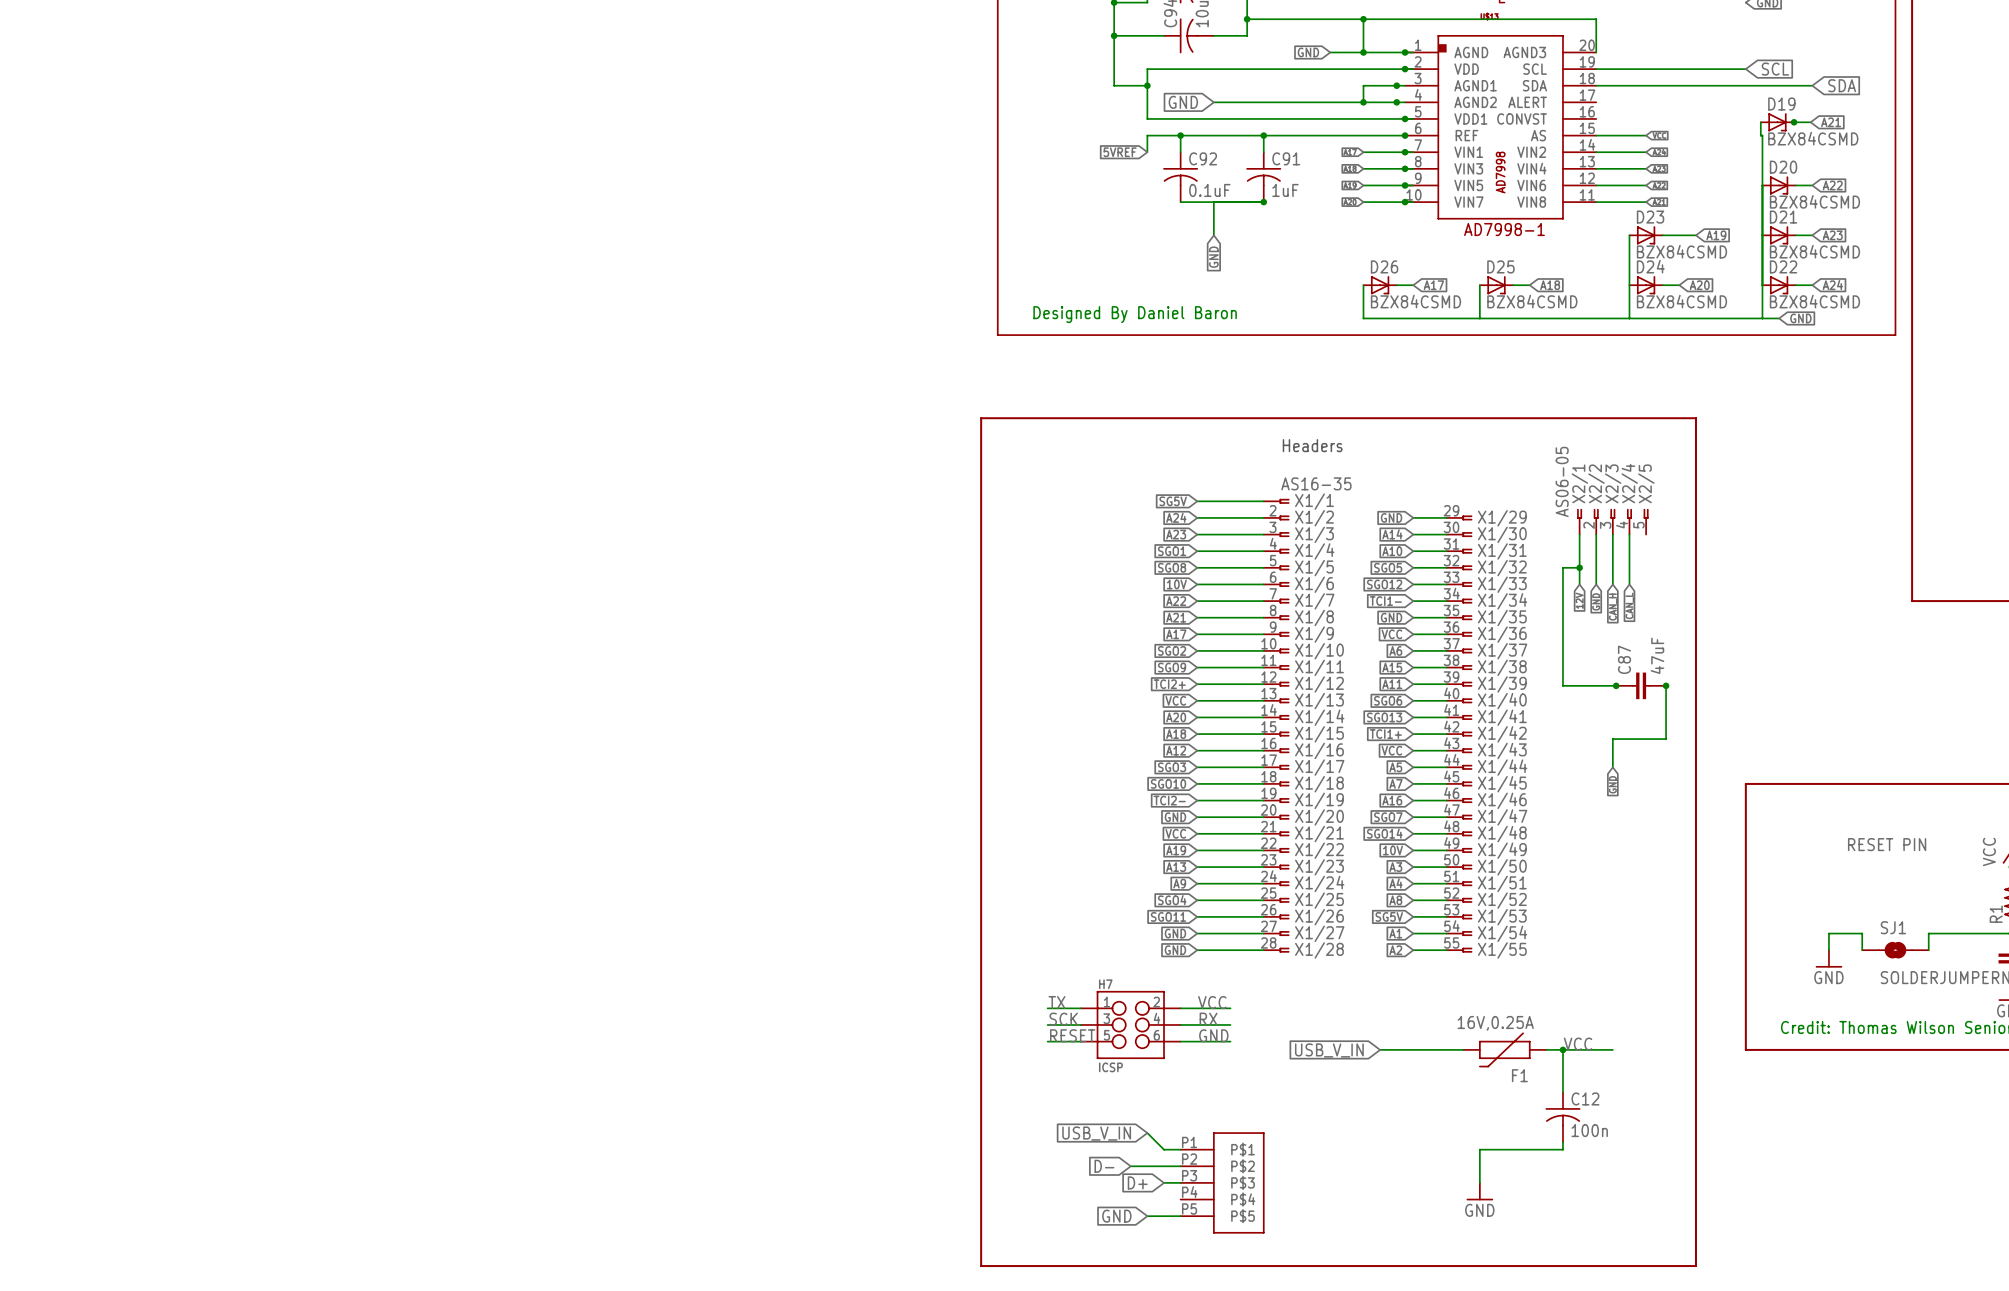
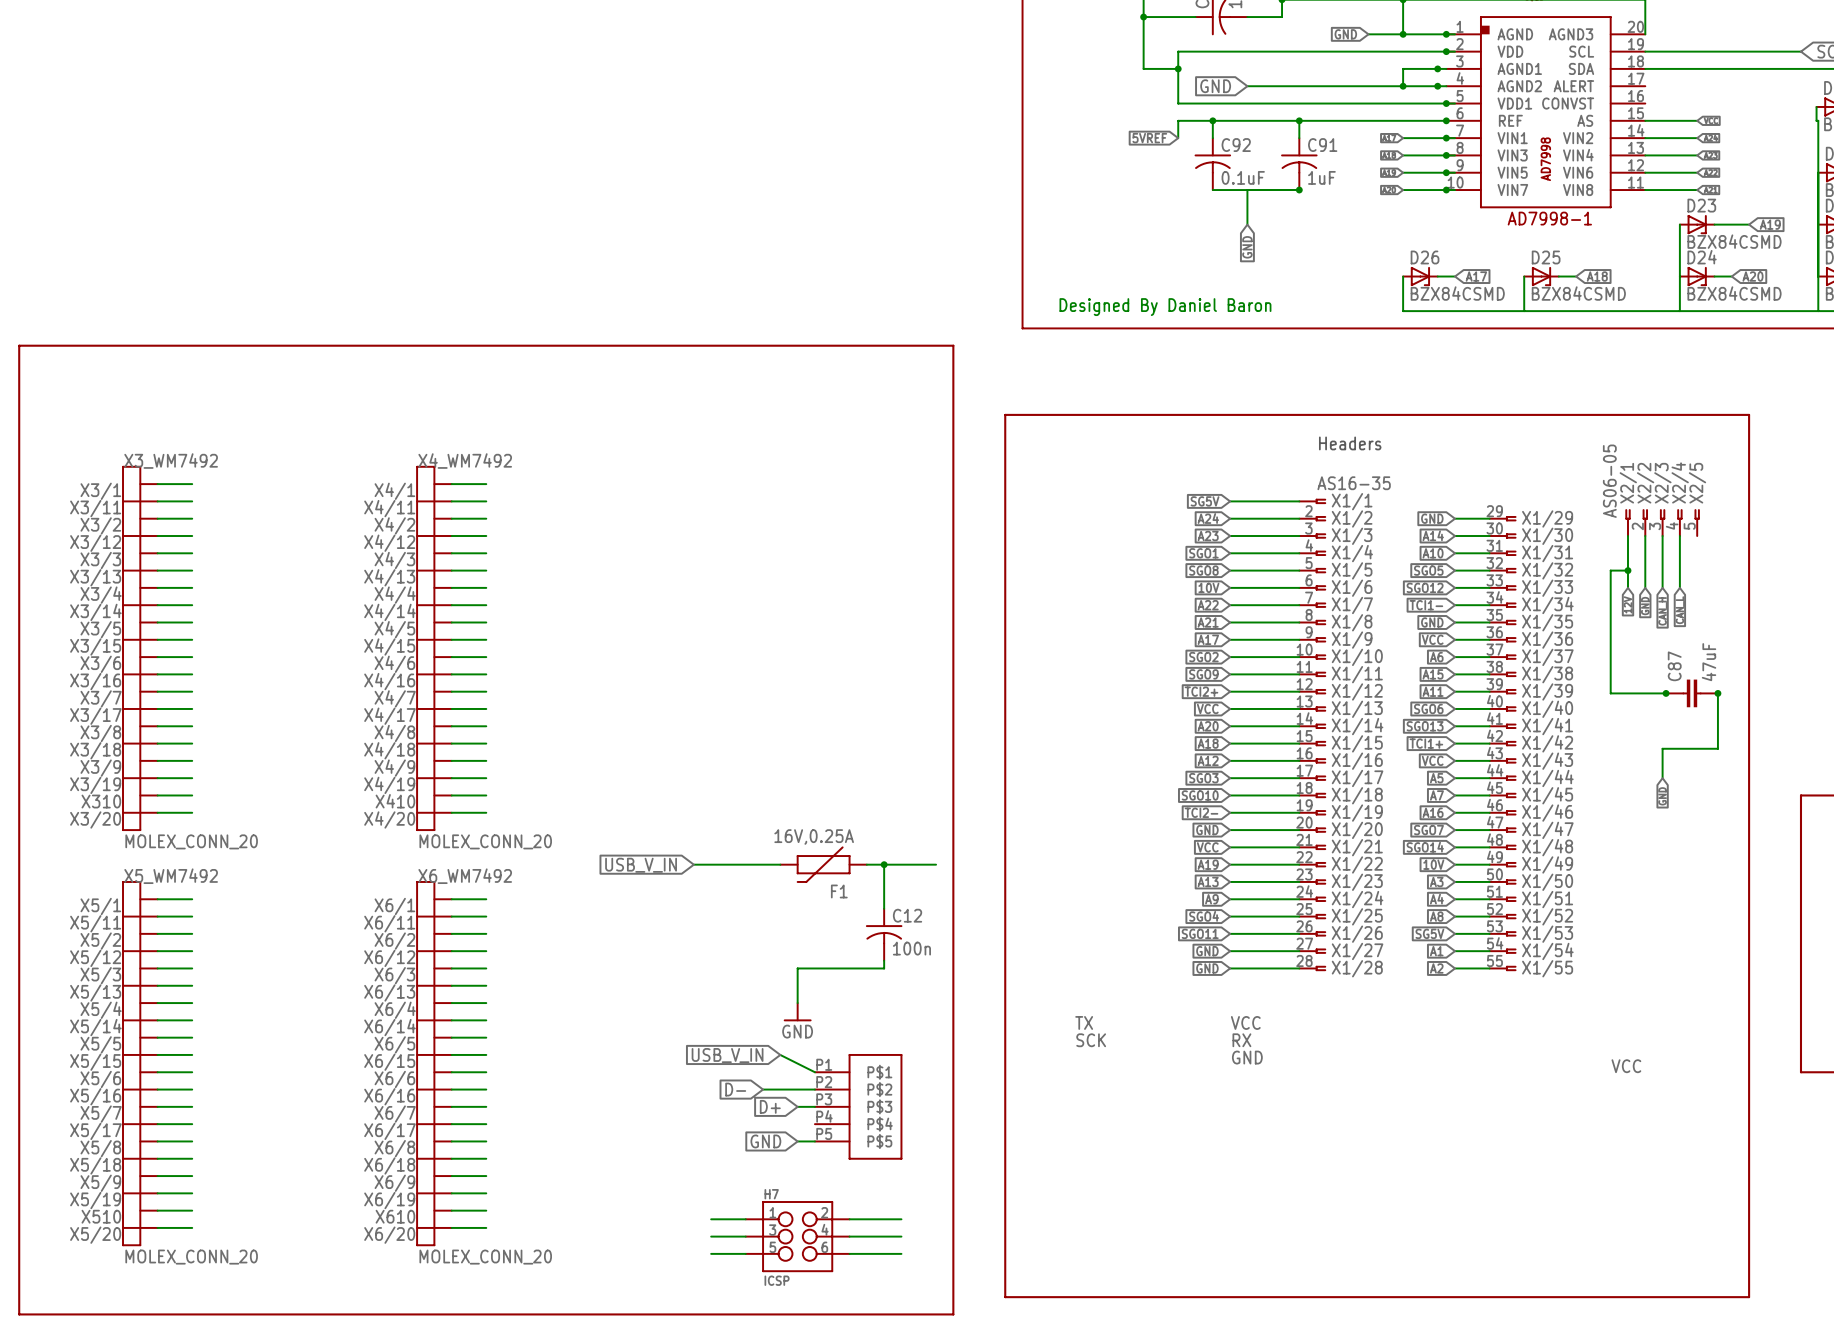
line: none -> (19, 345) (953, 345) (953, 1314) (19, 1314) (19, 345)
X3/1: none -> (148, 484)
wire: none -> (157, 484) (192, 484)
X4/1: none -> (443, 484)
wire: none -> (451, 484) (486, 484)
X3/11: none -> (140, 501)
wire: none -> (157, 501) (192, 501)
X4/11: none -> (434, 501)
wire: none -> (451, 501) (486, 501)
X3/2: none -> (148, 518)
wire: none -> (157, 518) (192, 518)
X4/2: none -> (443, 518)
wire: none -> (451, 518) (486, 518)
X3/12: none -> (140, 536)
wire: none -> (157, 536) (192, 536)
X4/12: none -> (434, 536)
wire: none -> (451, 536) (486, 536)
X3/3: none -> (148, 553)
wire: none -> (157, 553) (192, 553)
X4/3: none -> (443, 553)
wire: none -> (451, 553) (486, 553)
X3/13: none -> (140, 570)
wire: none -> (157, 570) (192, 570)
X4/13: none -> (434, 570)
wire: none -> (451, 570) (486, 570)
X3/4: none -> (148, 587)
wire: none -> (157, 587) (192, 587)
X4/4: none -> (443, 587)
wire: none -> (451, 587) (486, 587)
X3/14: none -> (140, 605)
wire: none -> (157, 605) (192, 605)
X4/14: none -> (434, 605)
wire: none -> (451, 605) (486, 605)
X3/5: none -> (148, 622)
wire: none -> (157, 622) (192, 622)
X4/5: none -> (443, 622)
wire: none -> (451, 622) (486, 622)
X3/15: none -> (140, 639)
wire: none -> (157, 639) (192, 639)
X4/15: none -> (434, 639)
wire: none -> (451, 639) (486, 639)
X3_WM7492: none -> MOLEX_CONN_20 (131, 648)
X4_WM7492: none -> MOLEX_CONN_20 (425, 648)
X3/6: none -> (148, 657)
wire: none -> (157, 657) (192, 657)
X4/6: none -> (443, 657)
wire: none -> (451, 657) (486, 657)
X3/16: none -> (140, 674)
wire: none -> (157, 674) (192, 674)
X4/16: none -> (434, 674)
wire: none -> (451, 674) (486, 674)
X3/7: none -> (148, 691)
wire: none -> (157, 691) (192, 691)
X4/7: none -> (443, 691)
wire: none -> (451, 691) (486, 691)
X3/17: none -> (140, 708)
wire: none -> (157, 708) (192, 708)
X4/17: none -> (434, 708)
wire: none -> (451, 708) (486, 708)
X3/8: none -> (148, 726)
wire: none -> (157, 726) (192, 726)
X4/8: none -> (443, 726)
wire: none -> (451, 726) (486, 726)
X3/18: none -> (140, 743)
wire: none -> (157, 743) (192, 743)
X4/18: none -> (434, 743)
wire: none -> (451, 743) (486, 743)
X3/9: none -> (148, 760)
wire: none -> (157, 760) (192, 760)
X4/9: none -> (443, 760)
wire: none -> (451, 760) (486, 760)
X3/19: none -> (140, 778)
wire: none -> (157, 778) (192, 778)
X4/19: none -> (434, 778)
wire: none -> (451, 778) (486, 778)
X310: none -> (148, 795)
wire: none -> (157, 795) (192, 795)
X410: none -> (443, 795)
wire: none -> (451, 795) (486, 795)
X3/20: none -> (140, 812)
wire: none -> (157, 812) (192, 812)
X4/20: none -> (434, 812)
wire: none -> (451, 812) (486, 812)
global label: none -> USB_V_IN (641, 865)
wire: none -> (693, 864) (780, 864)
wire: none -> (866, 864) (936, 864)
wire: none -> (884, 864) (884, 908)
junction: none -> (884, 864)
X5/1: none -> (148, 899)
wire: none -> (157, 899) (192, 899)
X6/1: none -> (443, 899)
wire: none -> (451, 899) (486, 899)
X5/11: none -> (140, 916)
wire: none -> (157, 916) (192, 916)
X6/11: none -> (434, 916)
wire: none -> (451, 916) (486, 916)
X5/2: none -> (148, 933)
wire: none -> (157, 933) (192, 933)
X6/2: none -> (443, 933)
wire: none -> (451, 933) (486, 933)
X5/12: none -> (140, 951)
wire: none -> (157, 951) (192, 951)
X6/12: none -> (434, 951)
wire: none -> (451, 951) (486, 951)
wire: none -> (884, 960) (884, 968) (797, 968) (797, 1003)
X5/3: none -> (148, 968)
wire: none -> (157, 968) (192, 968)
X6/3: none -> (443, 968)
wire: none -> (451, 968) (486, 968)
X5/13: none -> (140, 985)
wire: none -> (157, 985) (192, 985)
X6/13: none -> (434, 985)
wire: none -> (451, 985) (486, 985)
X5/4: none -> (148, 1003)
wire: none -> (157, 1003) (192, 1003)
X6/4: none -> (443, 1003)
wire: none -> (451, 1003) (486, 1003)
power symbol: none -> GND (797, 1012)
X5/14: none -> (140, 1020)
wire: none -> (157, 1020) (192, 1020)
X6/14: none -> (434, 1020)
wire: none -> (451, 1020) (486, 1020)
wire: (1047, 1008) (1080, 1008) -> none
wire: (1180, 1008) (1230, 1008) -> none
X5/5: none -> (148, 1037)
wire: none -> (157, 1037) (192, 1037)
X6/5: none -> (443, 1037)
wire: none -> (451, 1037) (486, 1037)
wire: (1047, 1024) (1080, 1024) -> none
H7 position: (1130, 1024) -> (797, 1236)
wire: (1180, 1024) (1230, 1024) -> none
X5/15: none -> (140, 1054)
wire: none -> (157, 1054) (192, 1054)
X6/15: none -> (434, 1054)
wire: none -> (451, 1054) (486, 1054)
global label: none -> USB_V_IN (727, 1055)
wire: none -> (780, 1054) (814, 1072)
label: RESET (1072, 1035) -> none
X5_WM7492: none -> MOLEX_CONN_20 (131, 1063)
X6_WM7492: none -> MOLEX_CONN_20 (425, 1063)
wire: (1047, 1041) (1080, 1041) -> none
wire: (1180, 1041) (1230, 1041) -> none
X5/6: none -> (148, 1072)
wire: none -> (157, 1072) (192, 1072)
X6/6: none -> (443, 1072)
wire: none -> (451, 1072) (486, 1072)
wire: (1380, 1049) (1463, 1049) -> none
F1 position: (1504, 1049) -> (823, 864)
wire: (1546, 1049) (1612, 1049) -> none
wire: (1562, 1049) (1562, 1092) -> none
junction: (1562, 1049) -> none
global label: USB_V_IN (1329, 1050) -> none
X5/16: none -> (140, 1089)
wire: none -> (157, 1089) (192, 1089)
X6/16: none -> (434, 1089)
wire: none -> (451, 1089) (486, 1089)
global label: none -> D- (735, 1089)
wire: none -> (763, 1089) (814, 1089)
X5/7: none -> (148, 1106)
wire: none -> (157, 1106) (192, 1106)
X6/7: none -> (443, 1106)
wire: none -> (451, 1106) (486, 1106)
global label: none -> D+ (770, 1106)
wire: none -> (797, 1106) (814, 1106)
part: none -> (858, 1106)
X5/17: none -> (140, 1124)
wire: none -> (157, 1124) (192, 1124)
X6/17: none -> (434, 1124)
wire: none -> (451, 1124) (486, 1124)
X5/8: none -> (148, 1141)
wire: none -> (157, 1141) (192, 1141)
X6/8: none -> (443, 1141)
wire: none -> (451, 1141) (486, 1141)
global label: none -> GND (765, 1141)
wire: none -> (797, 1141) (814, 1141)
C12 position: (1562, 1117) -> (884, 934)
X5/18: none -> (140, 1158)
wire: none -> (157, 1158) (192, 1158)
X6/18: none -> (434, 1158)
wire: none -> (451, 1158) (486, 1158)
global label: USB_V_IN (1096, 1133) -> none
wire: (1147, 1133) (1164, 1149) (1180, 1149) -> none
wire: (1562, 1142) (1562, 1149) (1479, 1149) (1479, 1182) -> none
X5/9: none -> (148, 1176)
wire: none -> (157, 1176) (192, 1176)
X6/9: none -> (443, 1176)
wire: none -> (451, 1176) (486, 1176)
X5/19: none -> (140, 1193)
wire: none -> (157, 1193) (192, 1193)
X6/19: none -> (434, 1193)
wire: none -> (451, 1193) (486, 1193)
global label: D- (1104, 1166) -> none
wire: (1130, 1166) (1180, 1166) -> none
X510: none -> (148, 1210)
wire: none -> (157, 1210) (192, 1210)
X610: none -> (443, 1210)
wire: none -> (451, 1210) (486, 1210)
global label: D+ (1137, 1182) -> none
wire: (1164, 1182) (1180, 1182) -> none
part: (1222, 1182) -> none
wire: none -> (711, 1219) (745, 1219)
wire: none -> (849, 1219) (901, 1219)
power symbol: GND (1479, 1191) -> none
X5/20: none -> (140, 1227)
wire: none -> (157, 1227) (192, 1227)
X6/20: none -> (434, 1227)
wire: none -> (451, 1227) (486, 1227)
wire: none -> (711, 1236) (745, 1236)
wire: none -> (849, 1236) (901, 1236)
global label: GND (1116, 1216) -> none
wire: (1147, 1216) (1180, 1216) -> none
wire: none -> (711, 1253) (745, 1253)
wire: none -> (849, 1253) (901, 1253)

